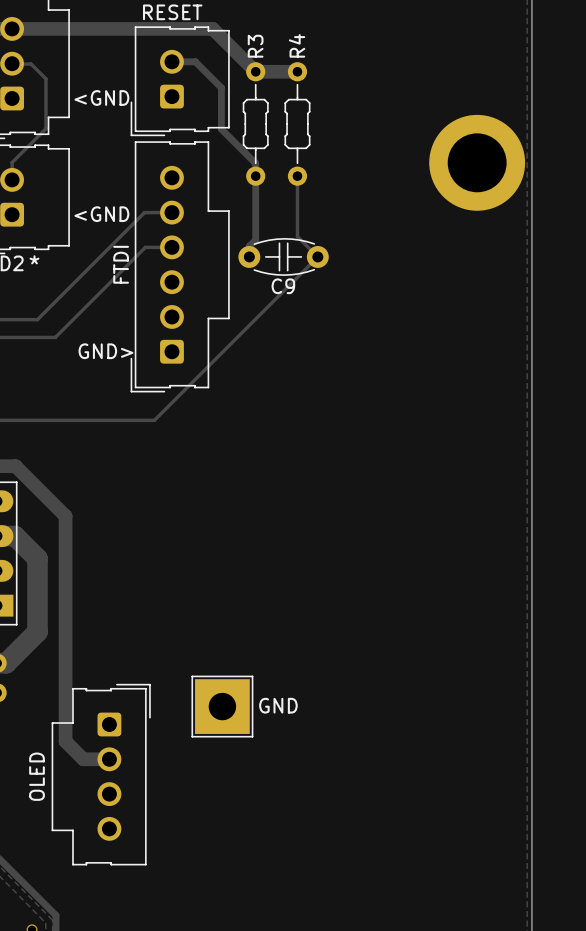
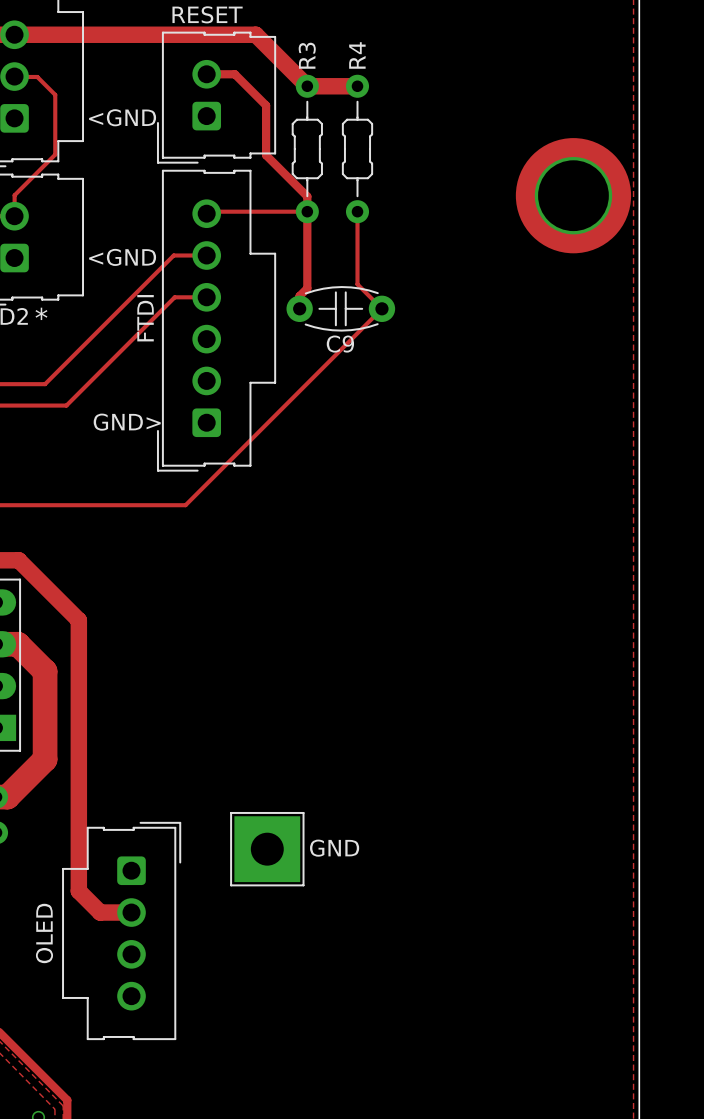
track: none -> (307, 211) (208, 211) (206, 213)

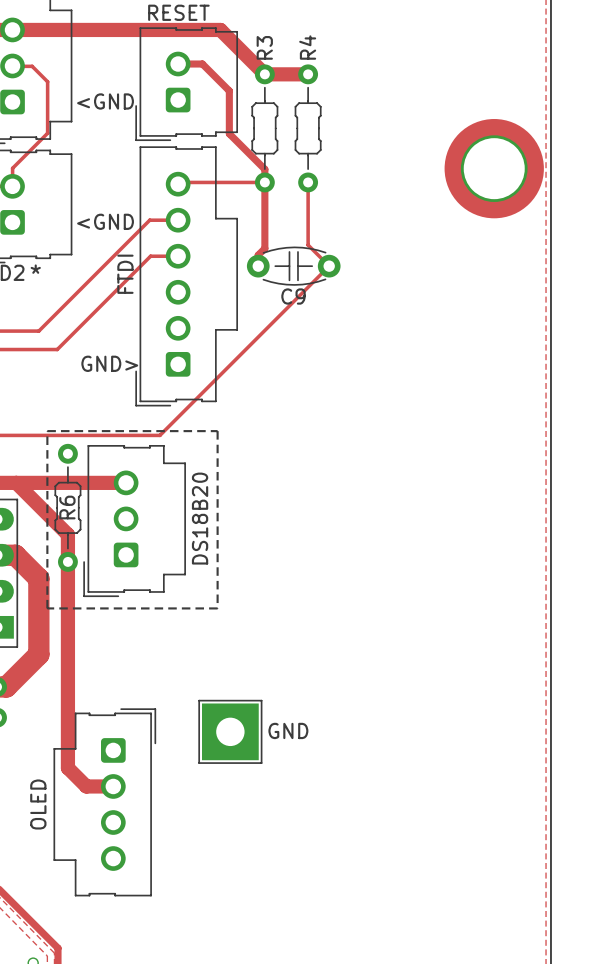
line: none -> (47, 431) (217, 431) (217, 608) (47, 608) (47, 431)
track: none -> (16, 482) (126, 482)
R6: none -> (67, 507)
part: none -> DS18B20 (134, 521)

